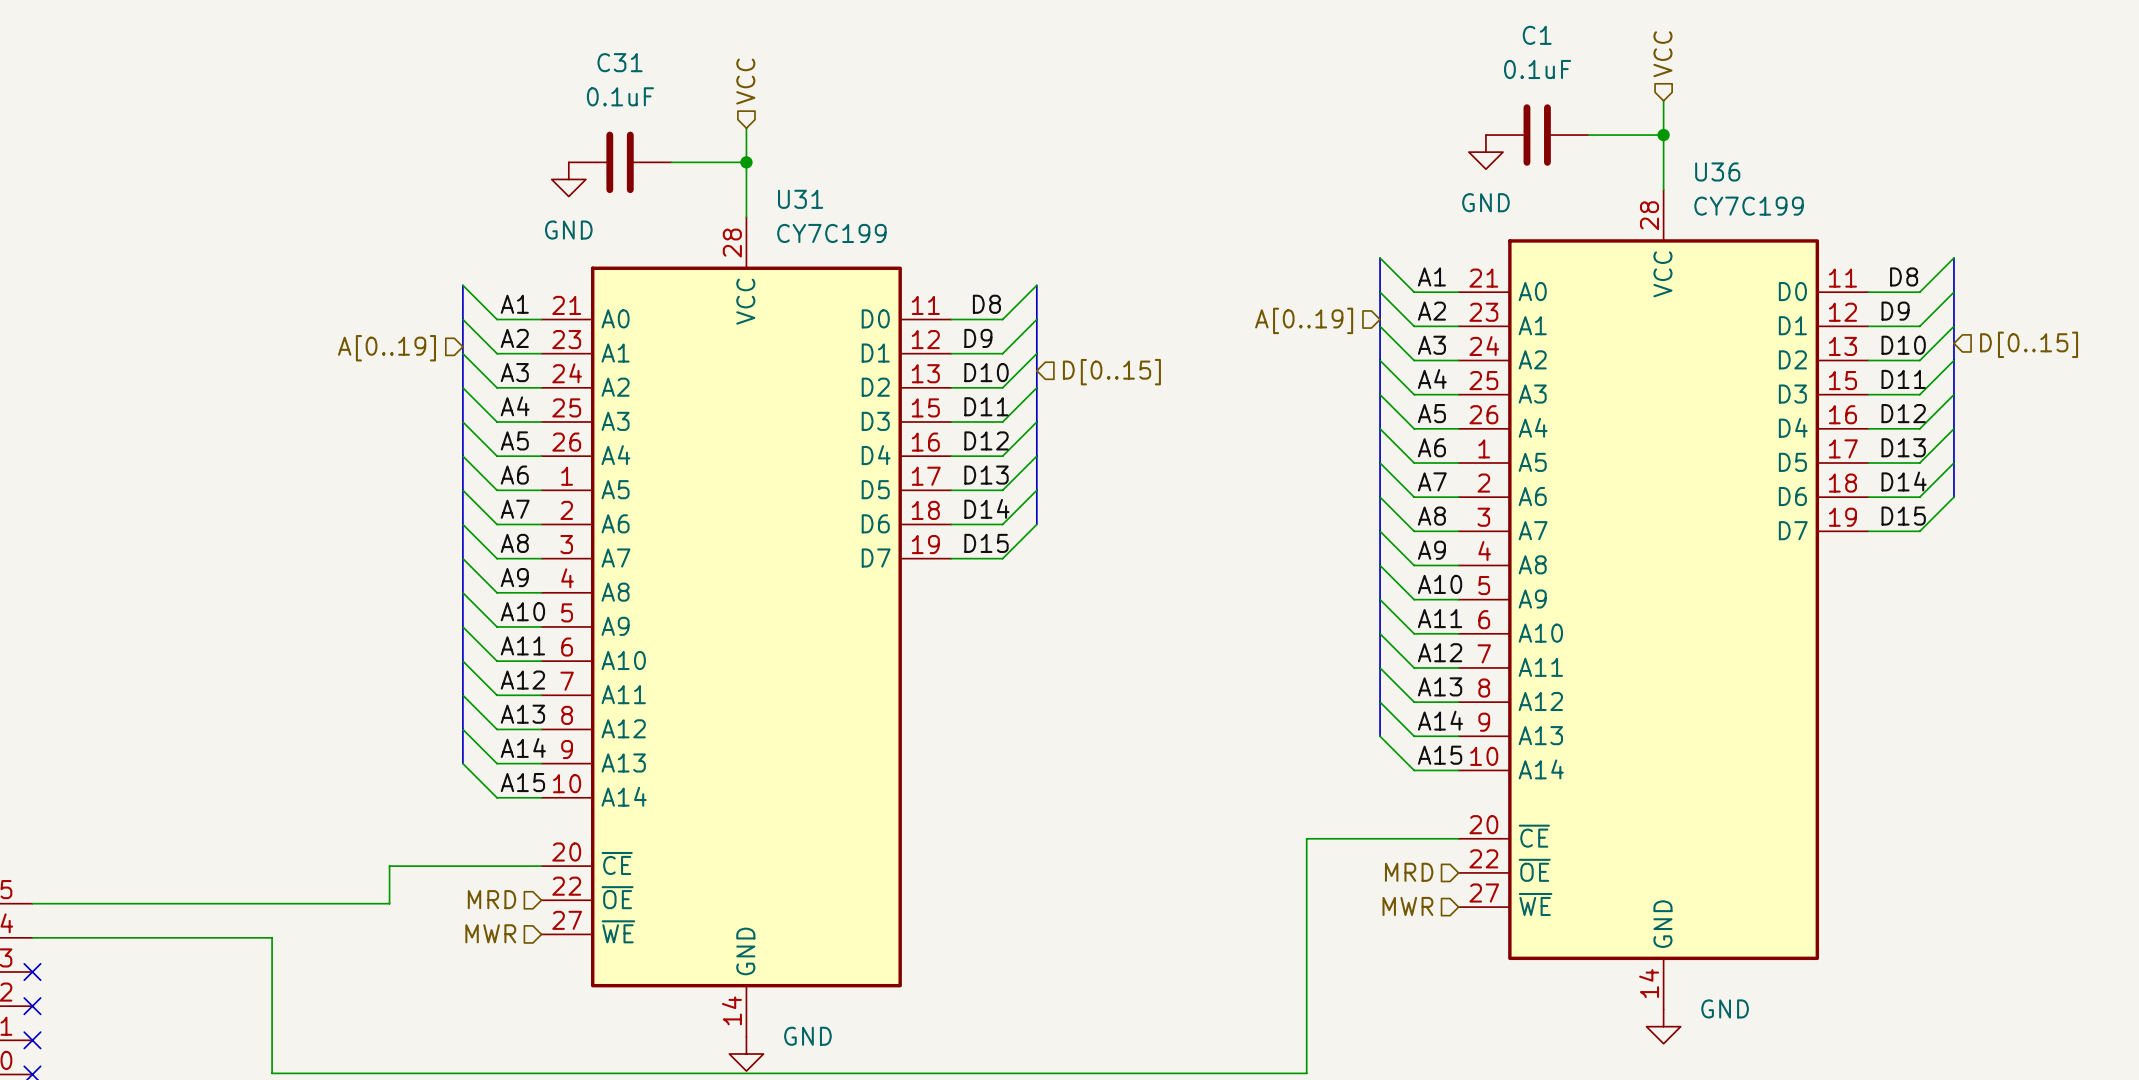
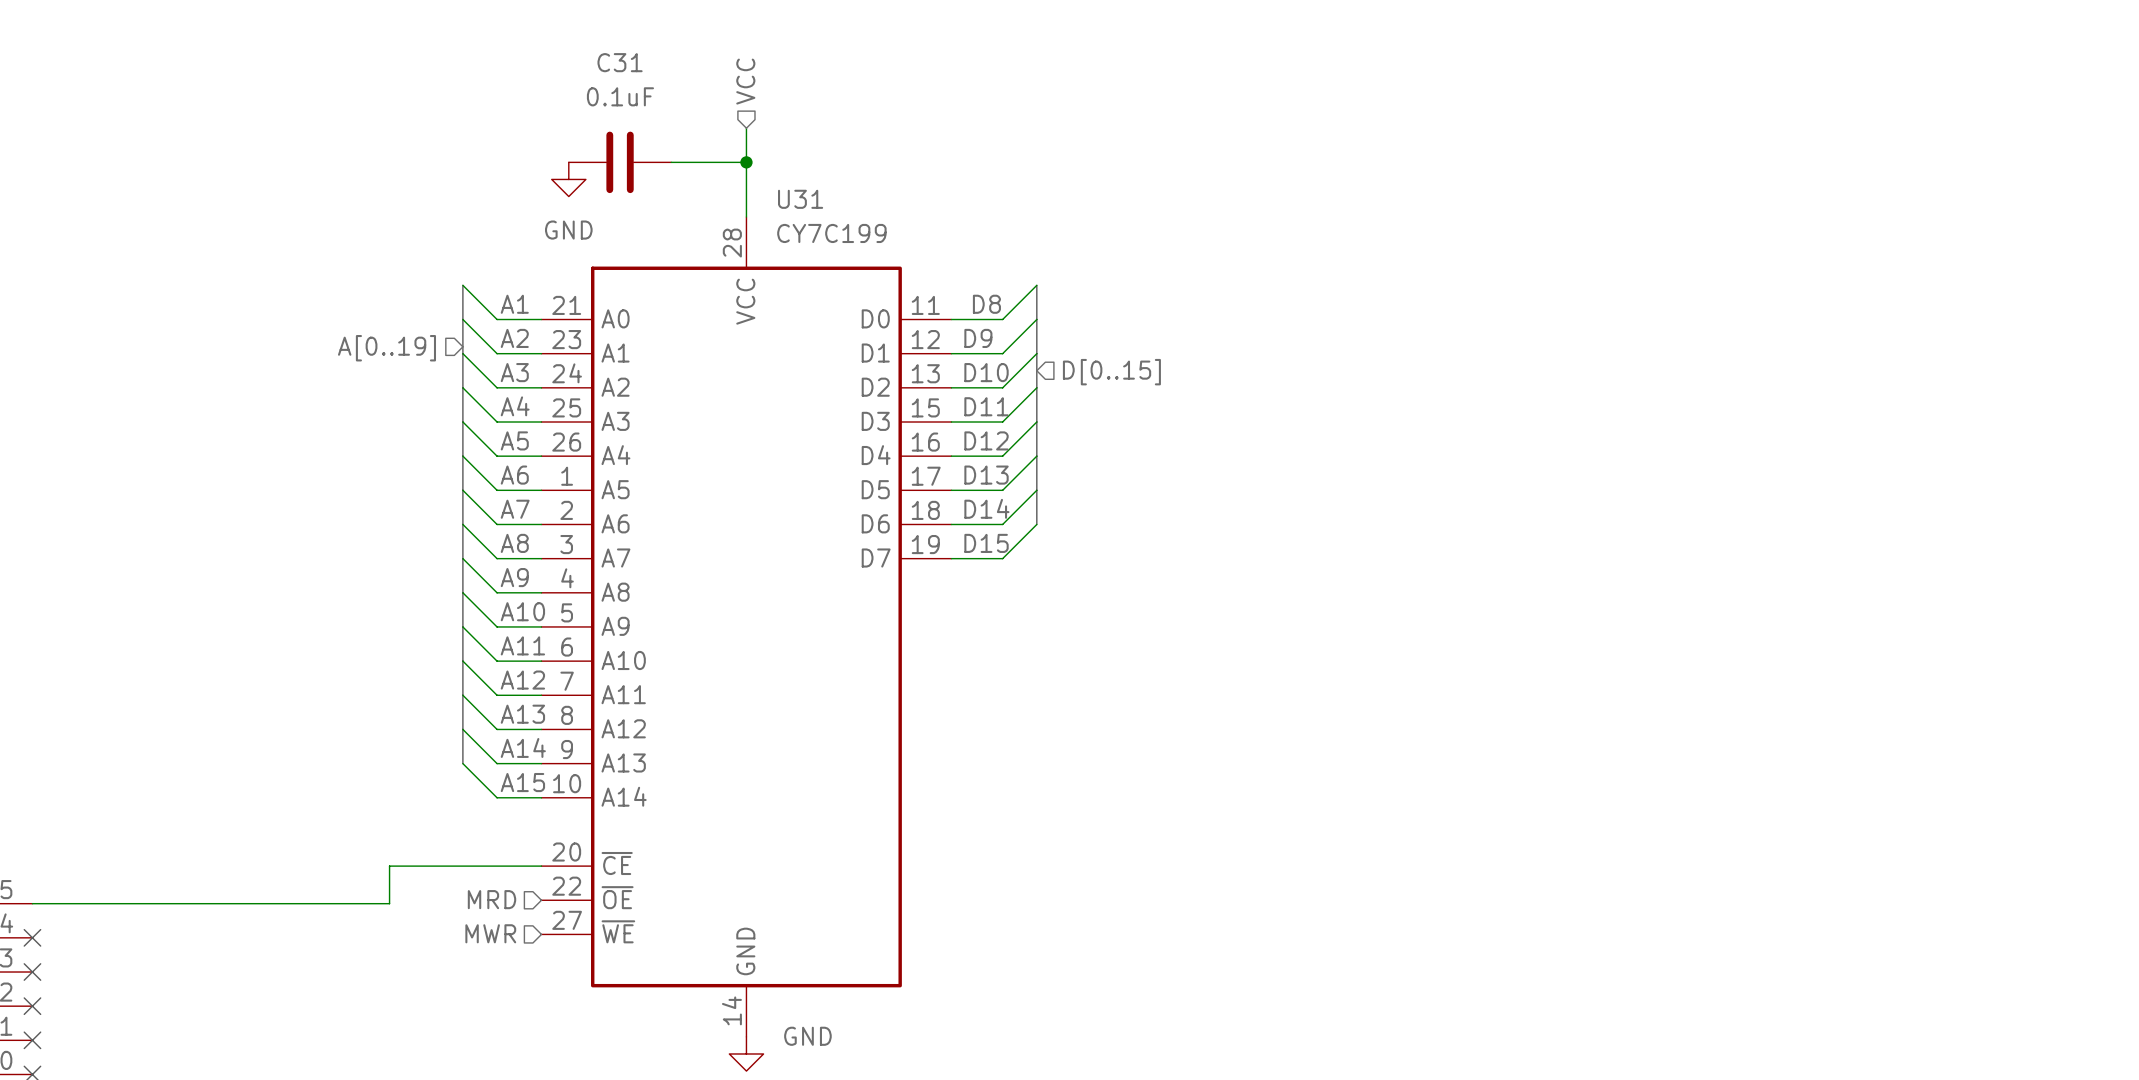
hierarchical label: VCC (1662, 54) -> none
wire: (1663, 100) (1663, 189) -> none
C1: 0.1uF (1537, 135) -> none
wire: (1588, 135) (1663, 135) -> none
junction: (1663, 135) -> none
power symbol: GND (1485, 152) -> none
wire: (1380, 258) (1414, 292) (1458, 292) -> none
bus: (1380, 258) (1380, 736) -> none
wire: (1953, 258) (1919, 292) (1868, 292) -> none
bus: (1953, 258) (1953, 497) -> none
label: A1 (1431, 276) -> none
label: D8 (1904, 276) -> none
wire: (1380, 292) (1414, 326) (1458, 326) -> none
wire: (1953, 292) (1919, 326) (1868, 326) -> none
label: A2 (1431, 311) -> none
label: D9 (1895, 311) -> none
hierarchical label: A[0..19] (1304, 320) -> none
wire: (1380, 326) (1414, 360) (1458, 360) -> none
wire: (1953, 326) (1919, 360) (1868, 360) -> none
hierarchical label: D[0..15] (2029, 344) -> none
label: A3 (1431, 345) -> none
label: D10 (1903, 345) -> none
wire: (1380, 360) (1414, 394) (1458, 394) -> none
wire: (1953, 360) (1919, 394) (1868, 394) -> none
label: A4 (1432, 379) -> none
label: D11 (1903, 379) -> none
wire: (1380, 394) (1414, 428) (1458, 428) -> none
wire: (1953, 394) (1919, 428) (1868, 428) -> none
label: A5 (1431, 413) -> none
label: D12 (1903, 413) -> none
wire: (1380, 428) (1414, 462) (1458, 462) -> none
wire: (1953, 428) (1919, 462) (1868, 462) -> none
label: A6 (1431, 447) -> none
label: D13 (1903, 447) -> none
wire: (1380, 462) (1414, 497) (1458, 497) -> none
wire: (1953, 462) (1919, 497) (1868, 497) -> none
label: A7 (1432, 481) -> none
label: D14 (1904, 481) -> none
wire: (1380, 497) (1414, 531) (1458, 531) -> none
wire: (1953, 497) (1919, 531) (1868, 531) -> none
label: A8 (1431, 516) -> none
label: D15 (1903, 516) -> none
wire: (1380, 531) (1414, 565) (1458, 565) -> none
label: A9 (1431, 550) -> none
wire: (1380, 565) (1414, 599) (1458, 599) -> none
label: A10 (1440, 584) -> none
wire: (1380, 599) (1414, 633) (1458, 633) -> none
U36: CY7C199 (1663, 599) -> none
label: A11 (1440, 618) -> none
wire: (1380, 633) (1414, 667) (1458, 667) -> none
label: A12 (1440, 652) -> none
wire: (1380, 667) (1414, 702) (1458, 702) -> none
label: A13 (1440, 686) -> none
wire: (1380, 702) (1414, 736) (1458, 736) -> none
label: A14 (1440, 720) -> none
wire: (1380, 736) (1414, 770) (1458, 770) -> none
label: A15 (1440, 755) -> none
wire: (1458, 838) (1306, 838) (1306, 1073) (272, 1073) (272, 937) (32, 937) -> none
hierarchical label: MRD (1409, 872) -> none
hierarchical label: MWR (1407, 906) -> none
no-connect mark: none -> (32, 937)
power symbol: GND (1663, 1026) -> none

